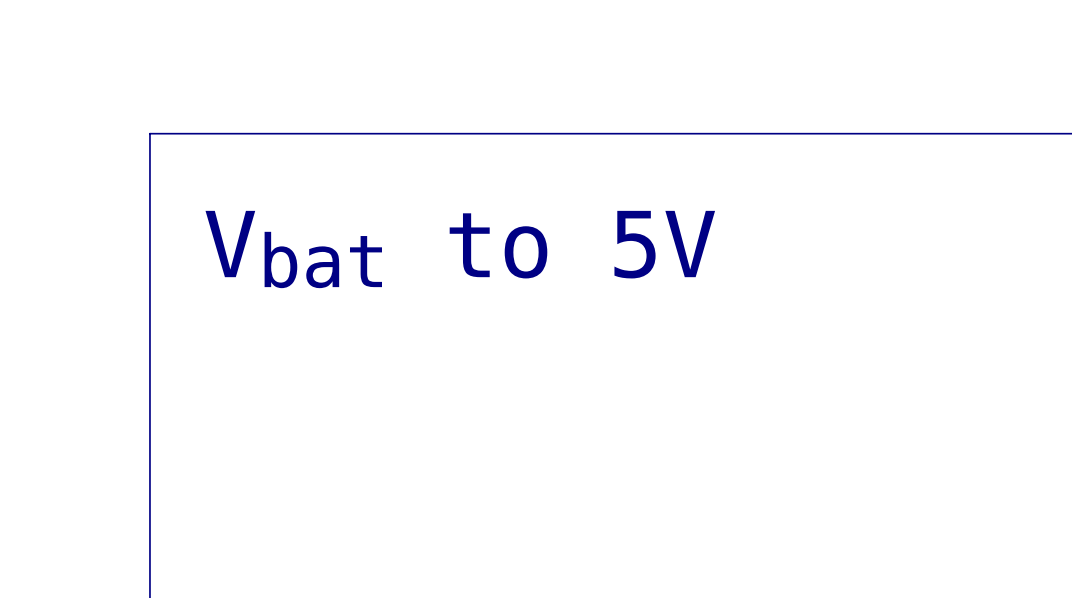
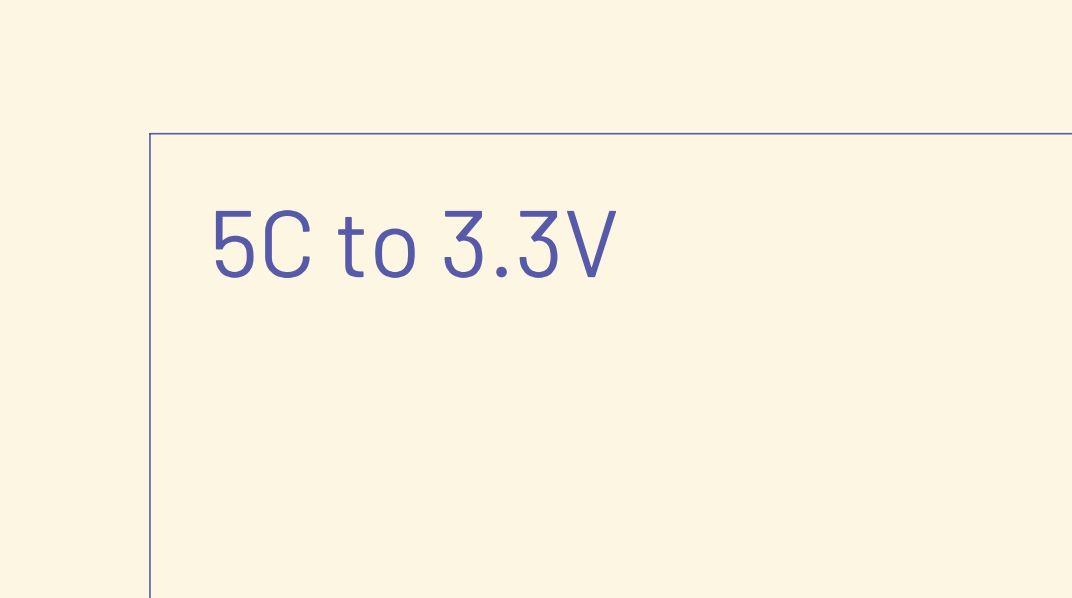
text: Vbat to 5V (460, 249) -> 5C to 3.3V (416, 244)

